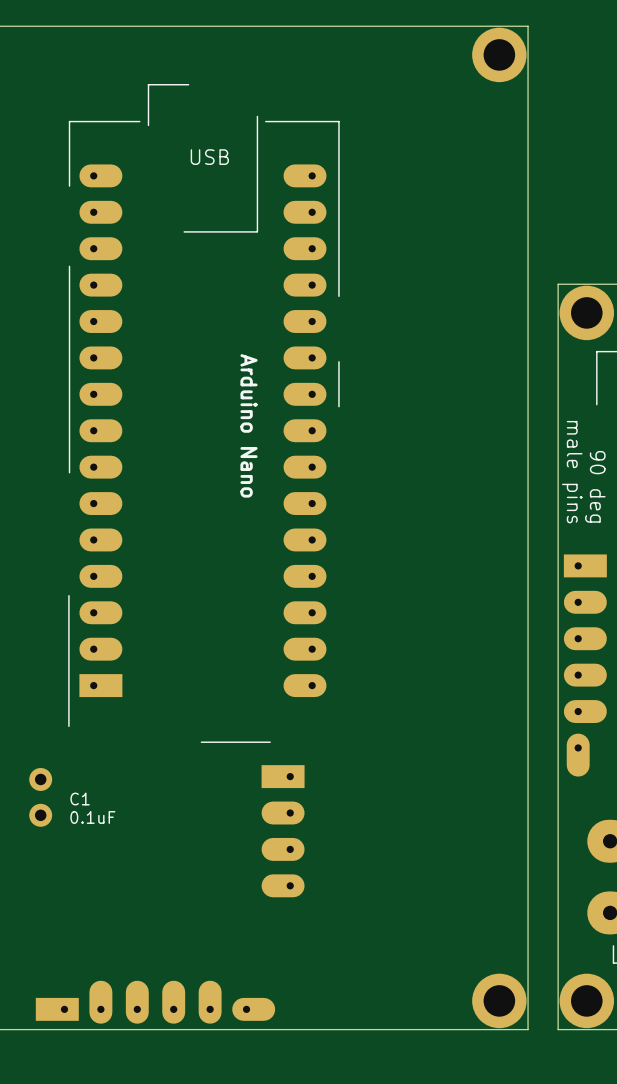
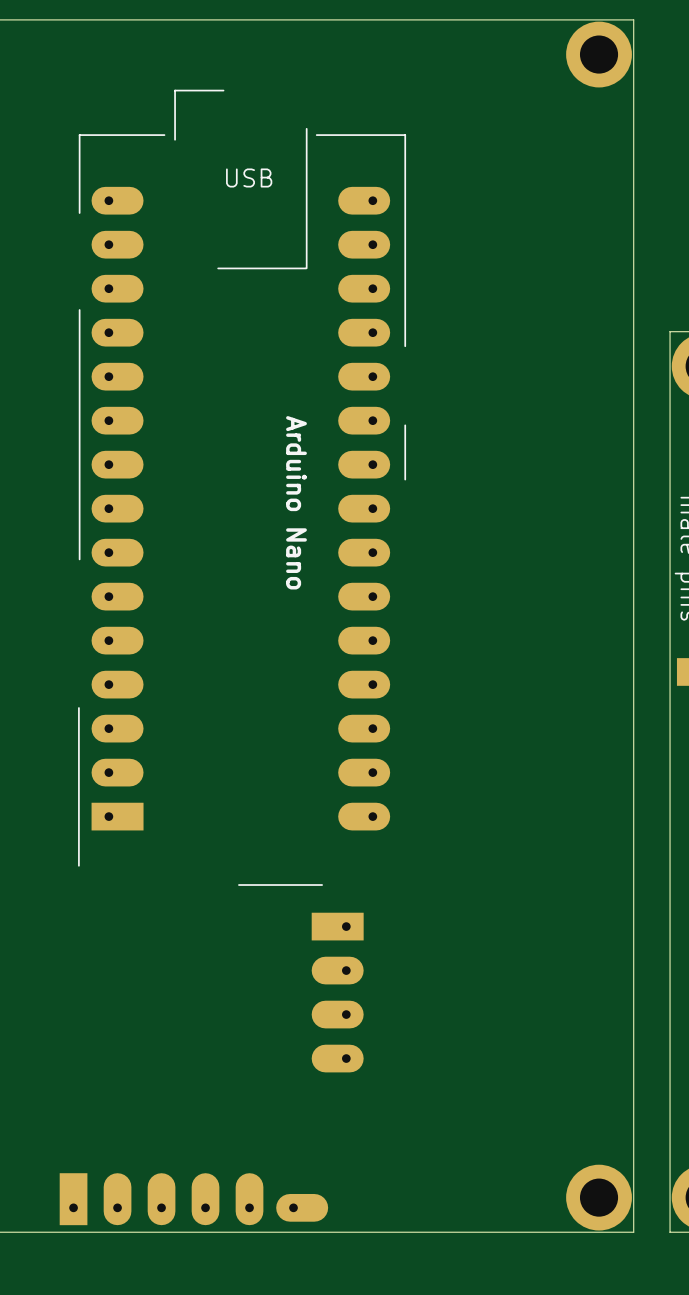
part: (40, 797) -> none
text: C1 (80, 799) -> none
text: 0.1uF (92, 817) -> none
part footprint: [35, 980, 276, 1024] -> [59, 1173, 329, 1226]

